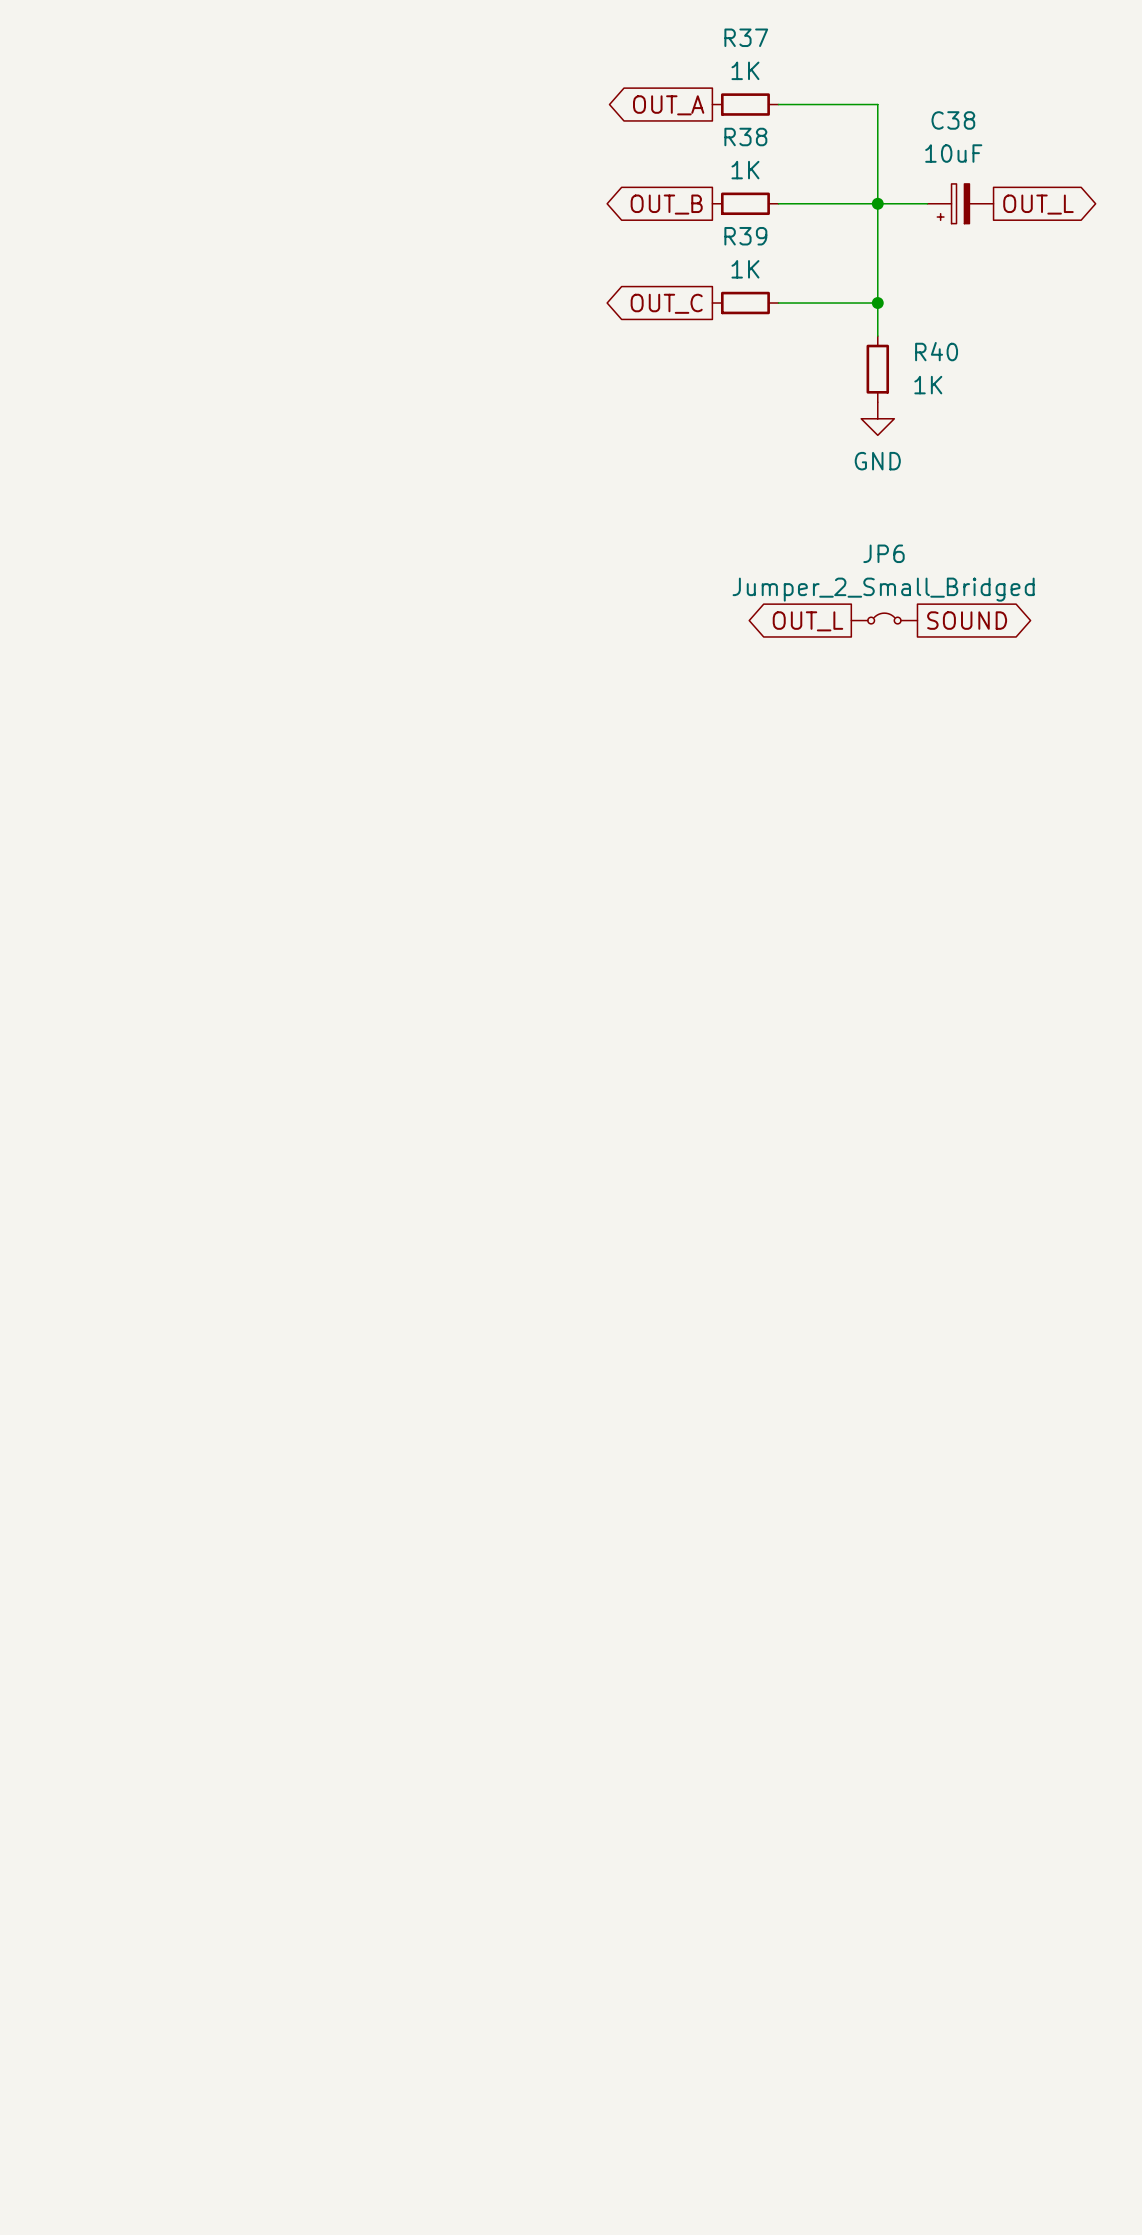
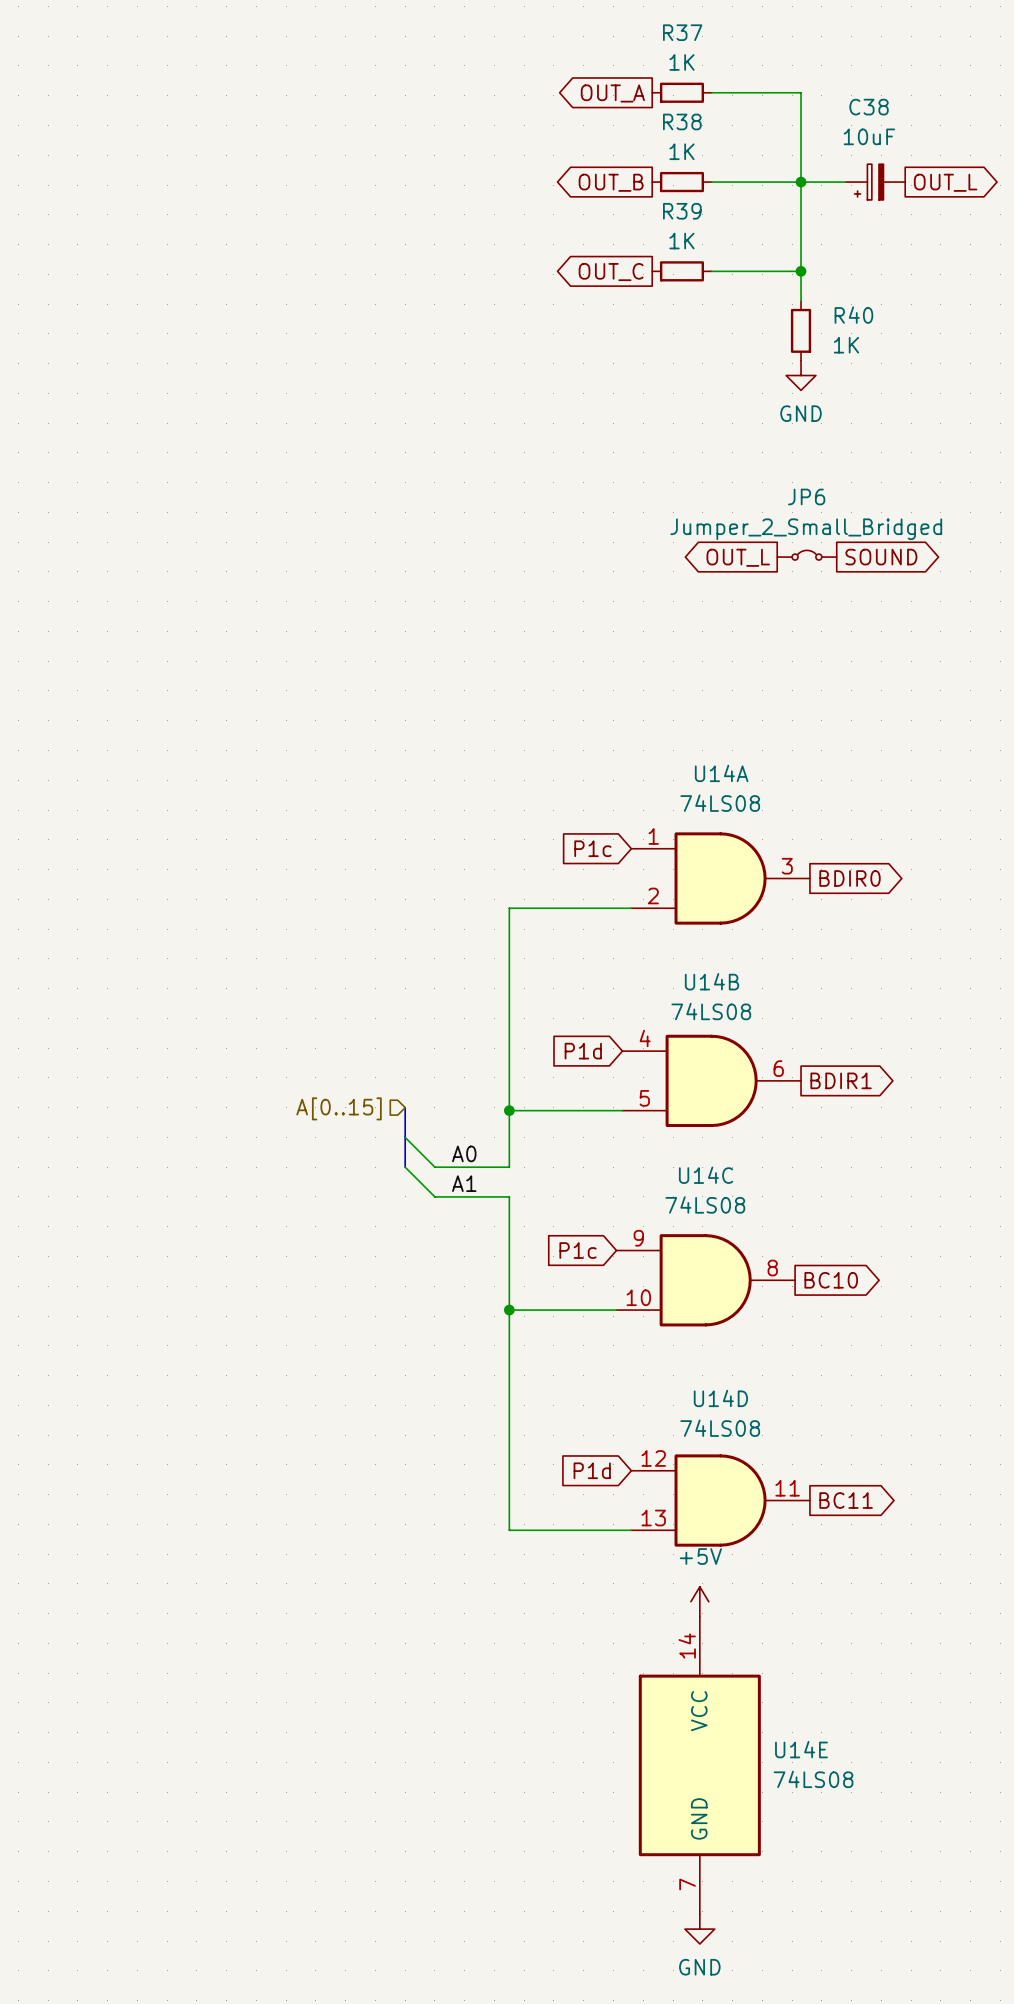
global label: none -> P1c (592, 848)
U14A: none -> 74LS08 (720, 878)
global label: none -> BDIR0 (850, 878)
wire: none -> (631, 908) (509, 908) (509, 1167) (434, 1167) (405, 1137)
global label: none -> P1d (583, 1051)
U14B: none -> 74LS08 (711, 1080)
global label: none -> BDIR1 (841, 1080)
bus: none -> (405, 1107) (405, 1167)
hierarchical label: none -> A[0..15] (339, 1108)
wire: none -> (509, 1110) (622, 1110)
junction: none -> (509, 1110)
label: none -> A0 (464, 1153)
wire: none -> (405, 1167) (434, 1196) (509, 1196) (509, 1530) (631, 1530)
label: none -> A1 (464, 1183)
global label: none -> P1c (578, 1250)
U14C: none -> 74LS08 (705, 1280)
global label: none -> BC10 (831, 1280)
wire: none -> (509, 1310) (616, 1310)
junction: none -> (509, 1310)
global label: none -> P1d (592, 1470)
U14D: none -> 74LS08 (720, 1500)
global label: none -> BC11 (846, 1500)
power symbol: none -> +5V (699, 1601)
U14E: none -> 74LS08 (699, 1765)
power symbol: none -> GND (699, 1929)

